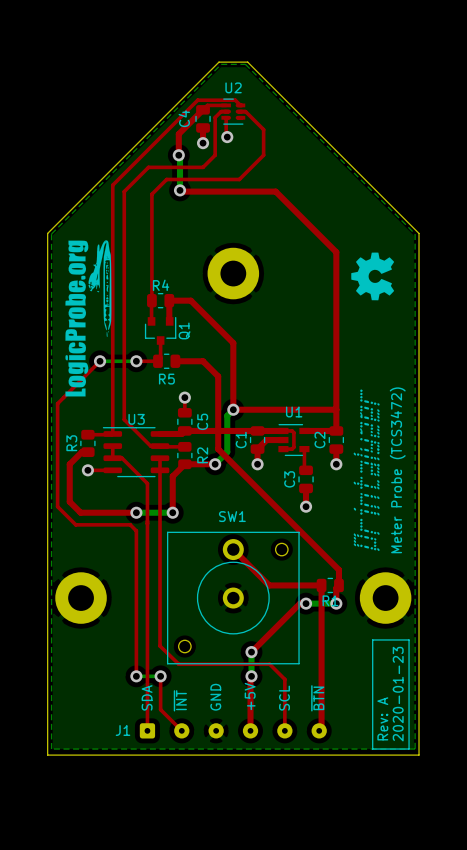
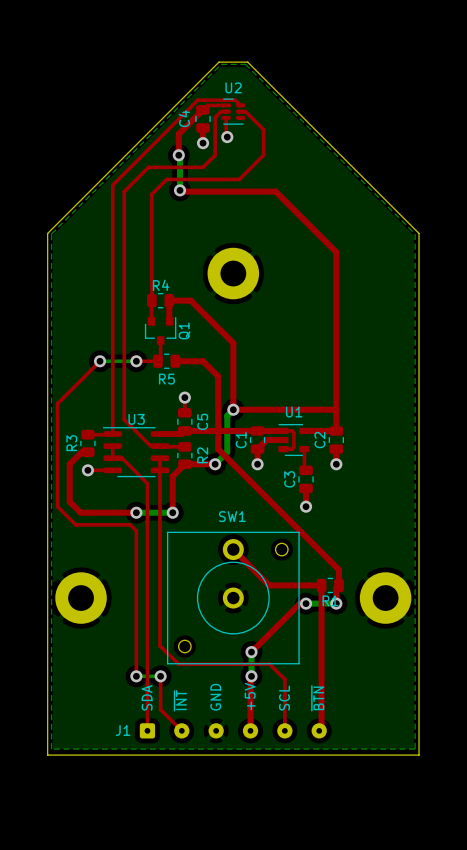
drawing: [65, 240, 112, 397] -> none
drawing: [351, 252, 395, 301] -> none
drawing: [353, 389, 380, 551] -> none
text: Meter Probe (TCS3472) (397, 470) -> none
line: (372, 639) (372, 749) (409, 749) (409, 639) (372, 639) -> none
text: 2020-01-23 (398, 694) -> none
text: Rev: A (382, 718) -> none

